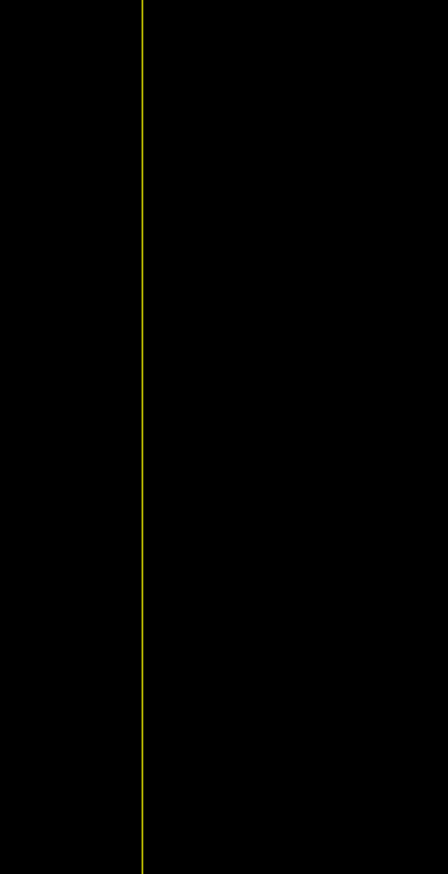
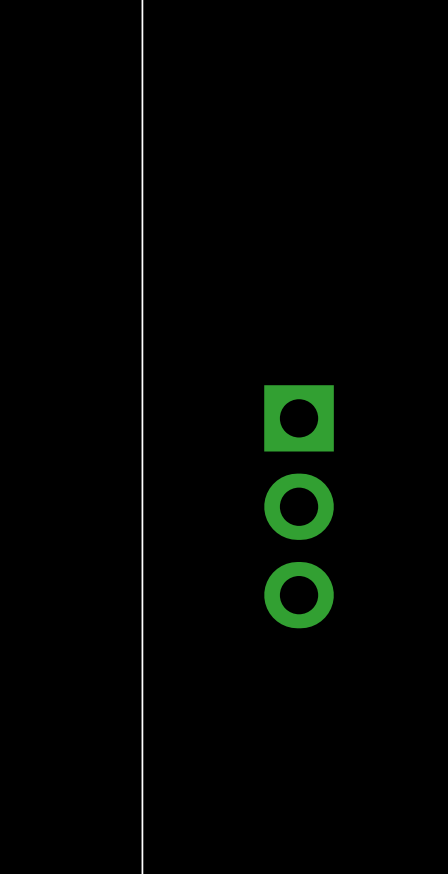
part: none -> (299, 506)

